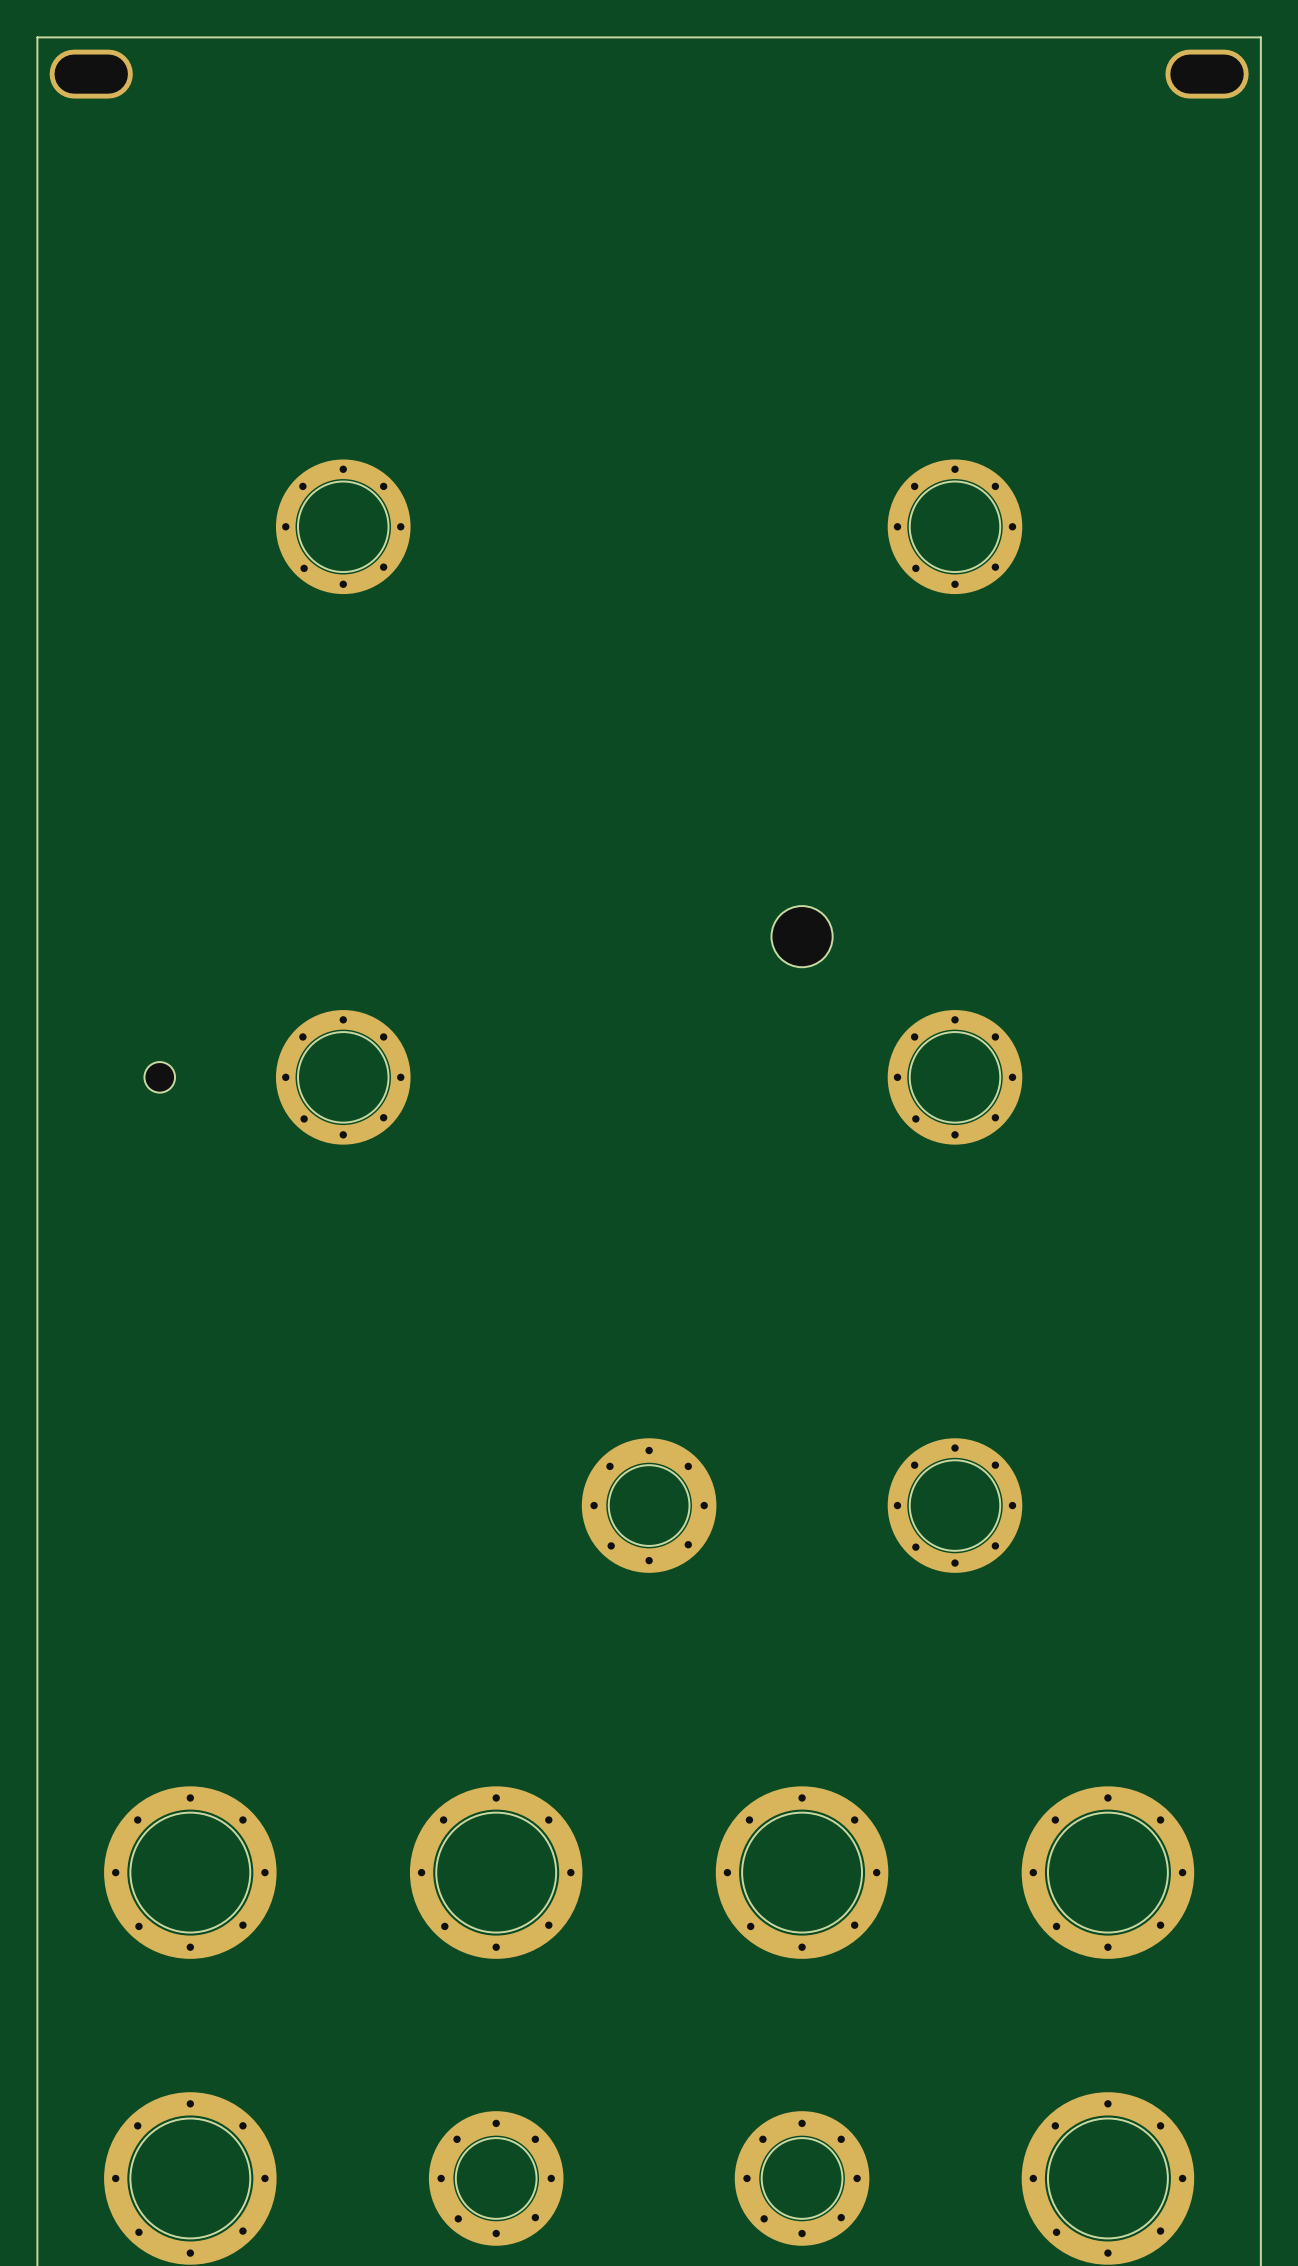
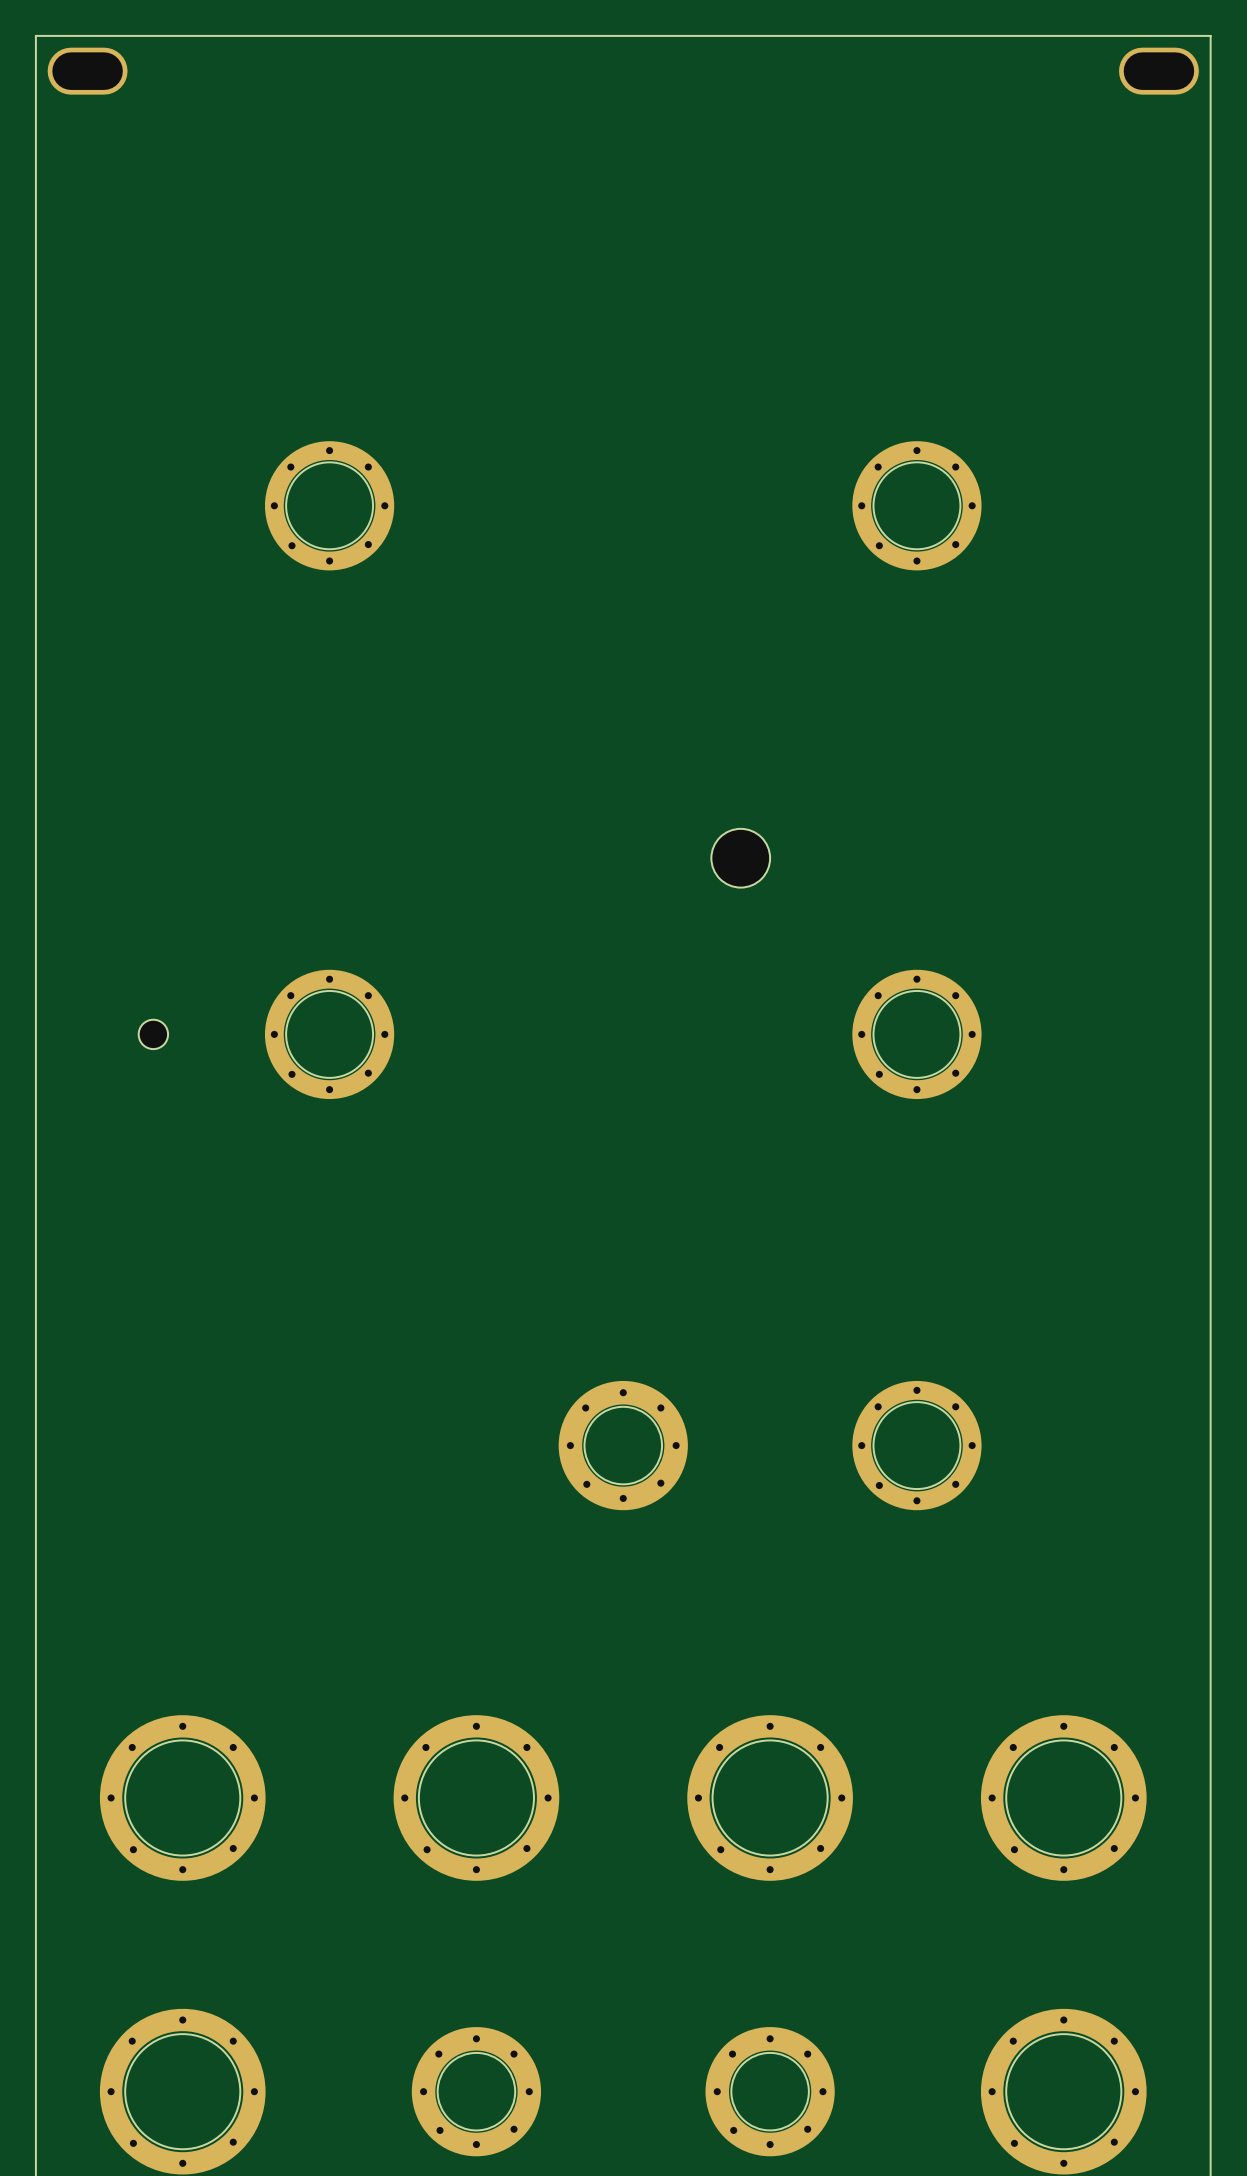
part position: (802, 936) -> (740, 858)

